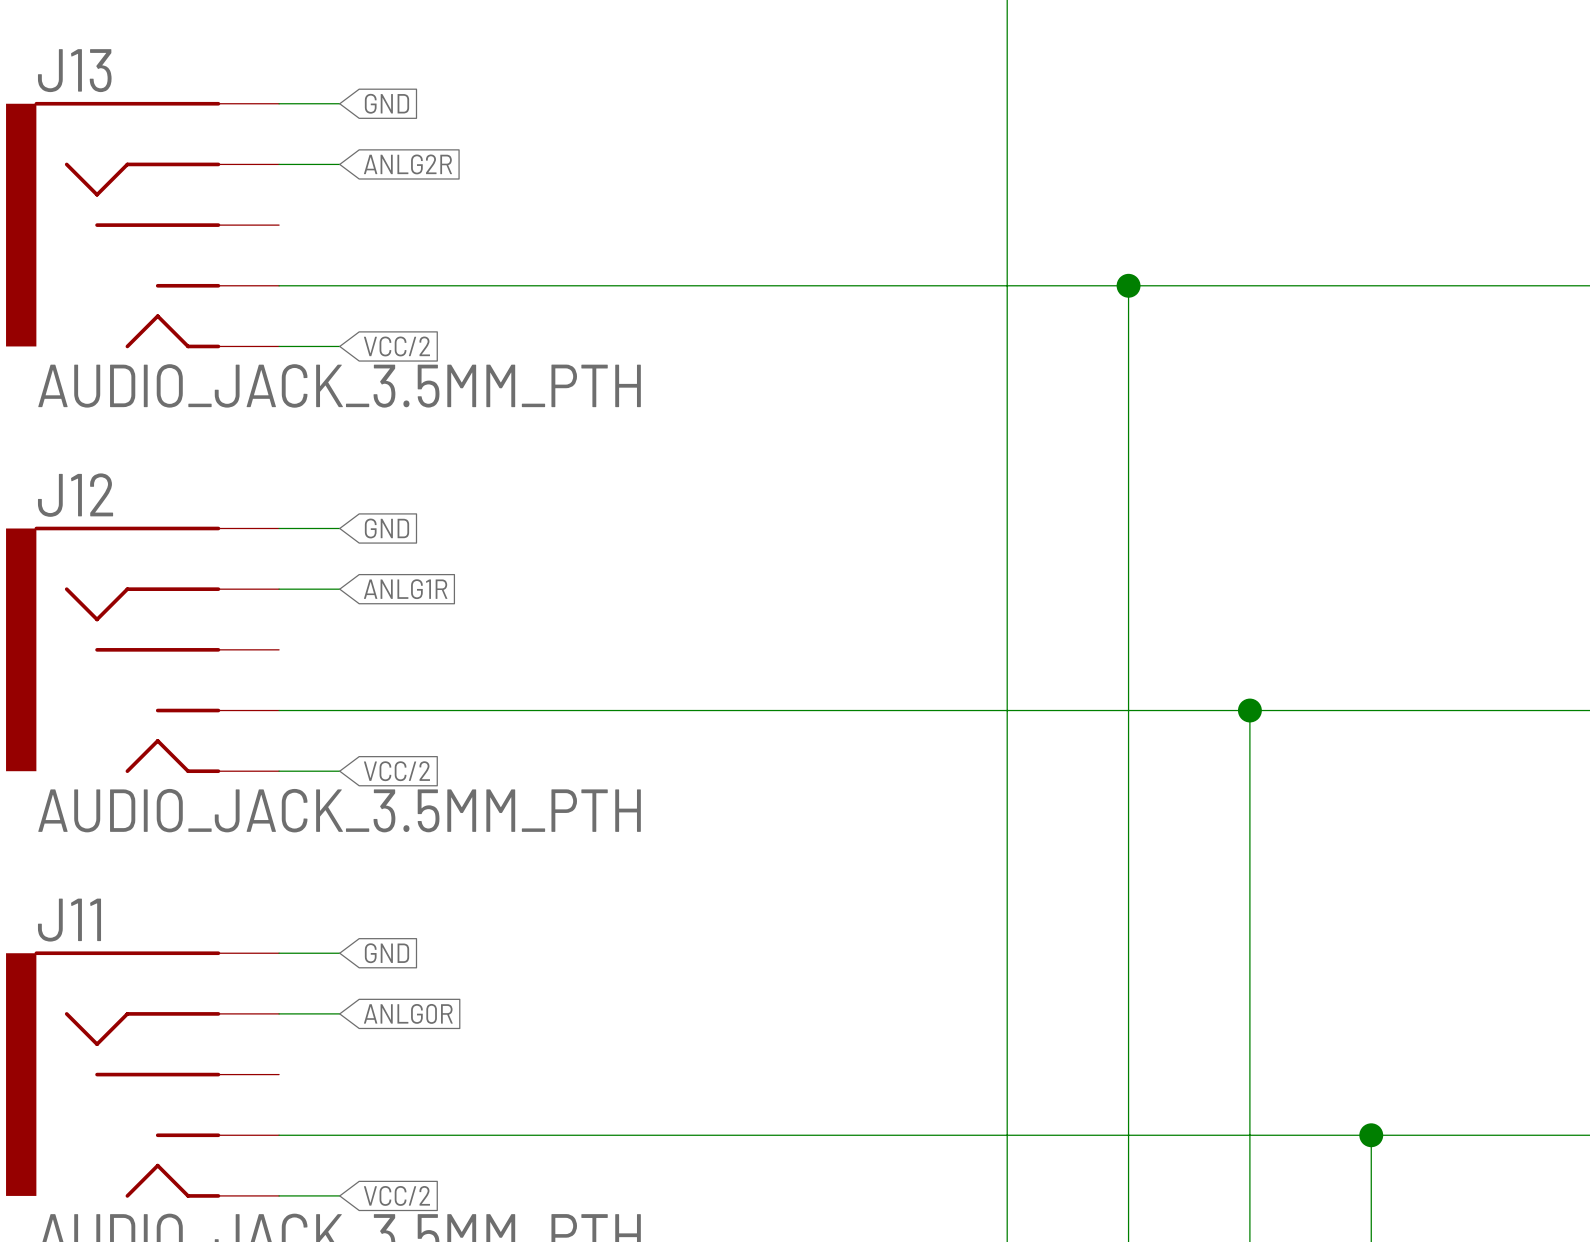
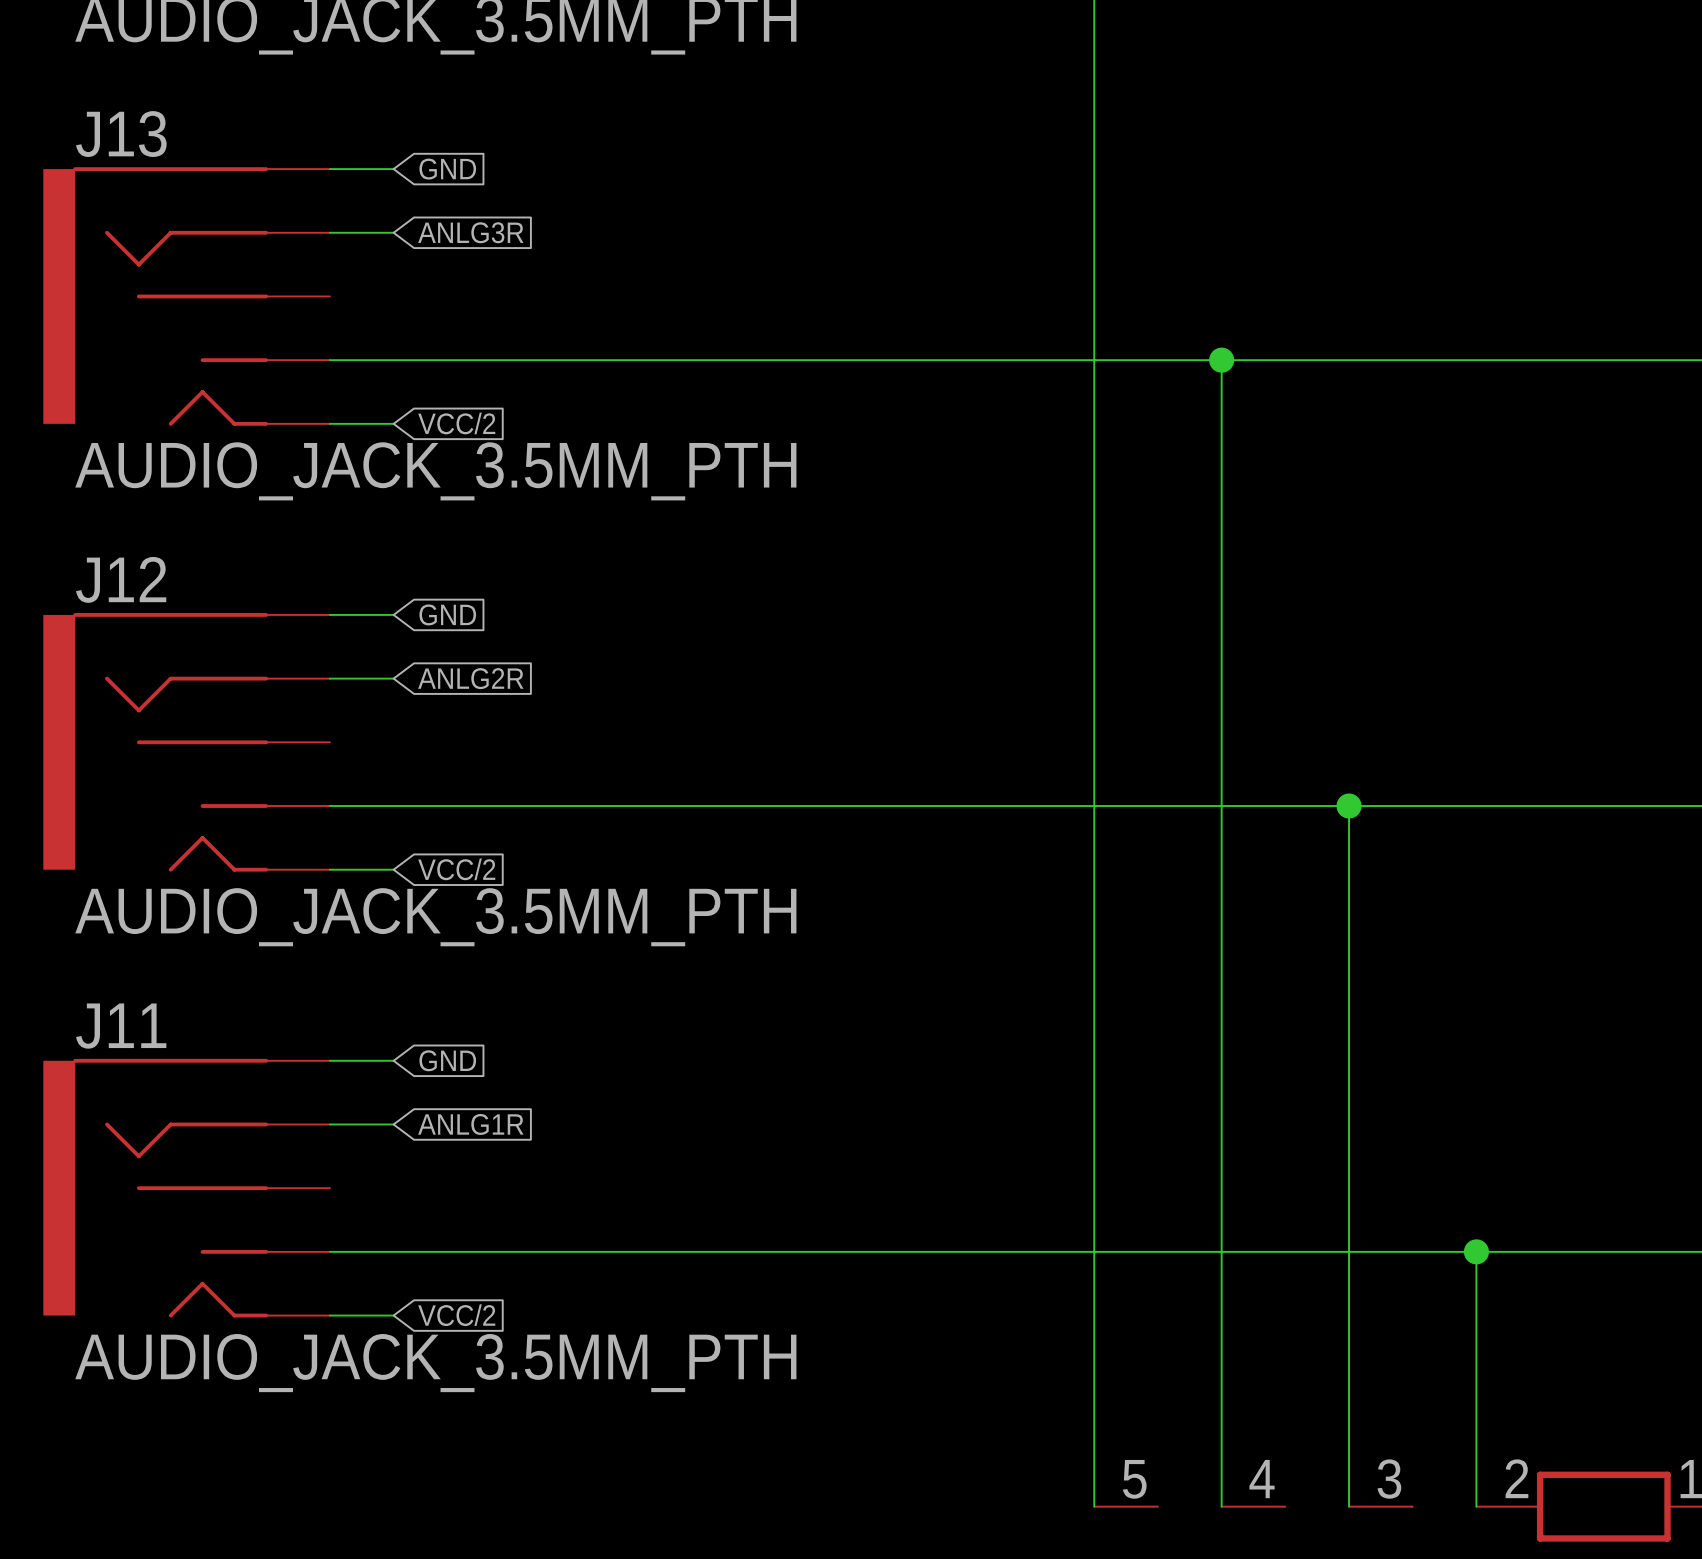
global label: ANLG2R (407, 164) -> ANLG3R (470, 232)
global label: ANLG1R (405, 589) -> ANLG2R (470, 678)
global label: ANLG0R (408, 1013) -> ANLG1R (470, 1124)

